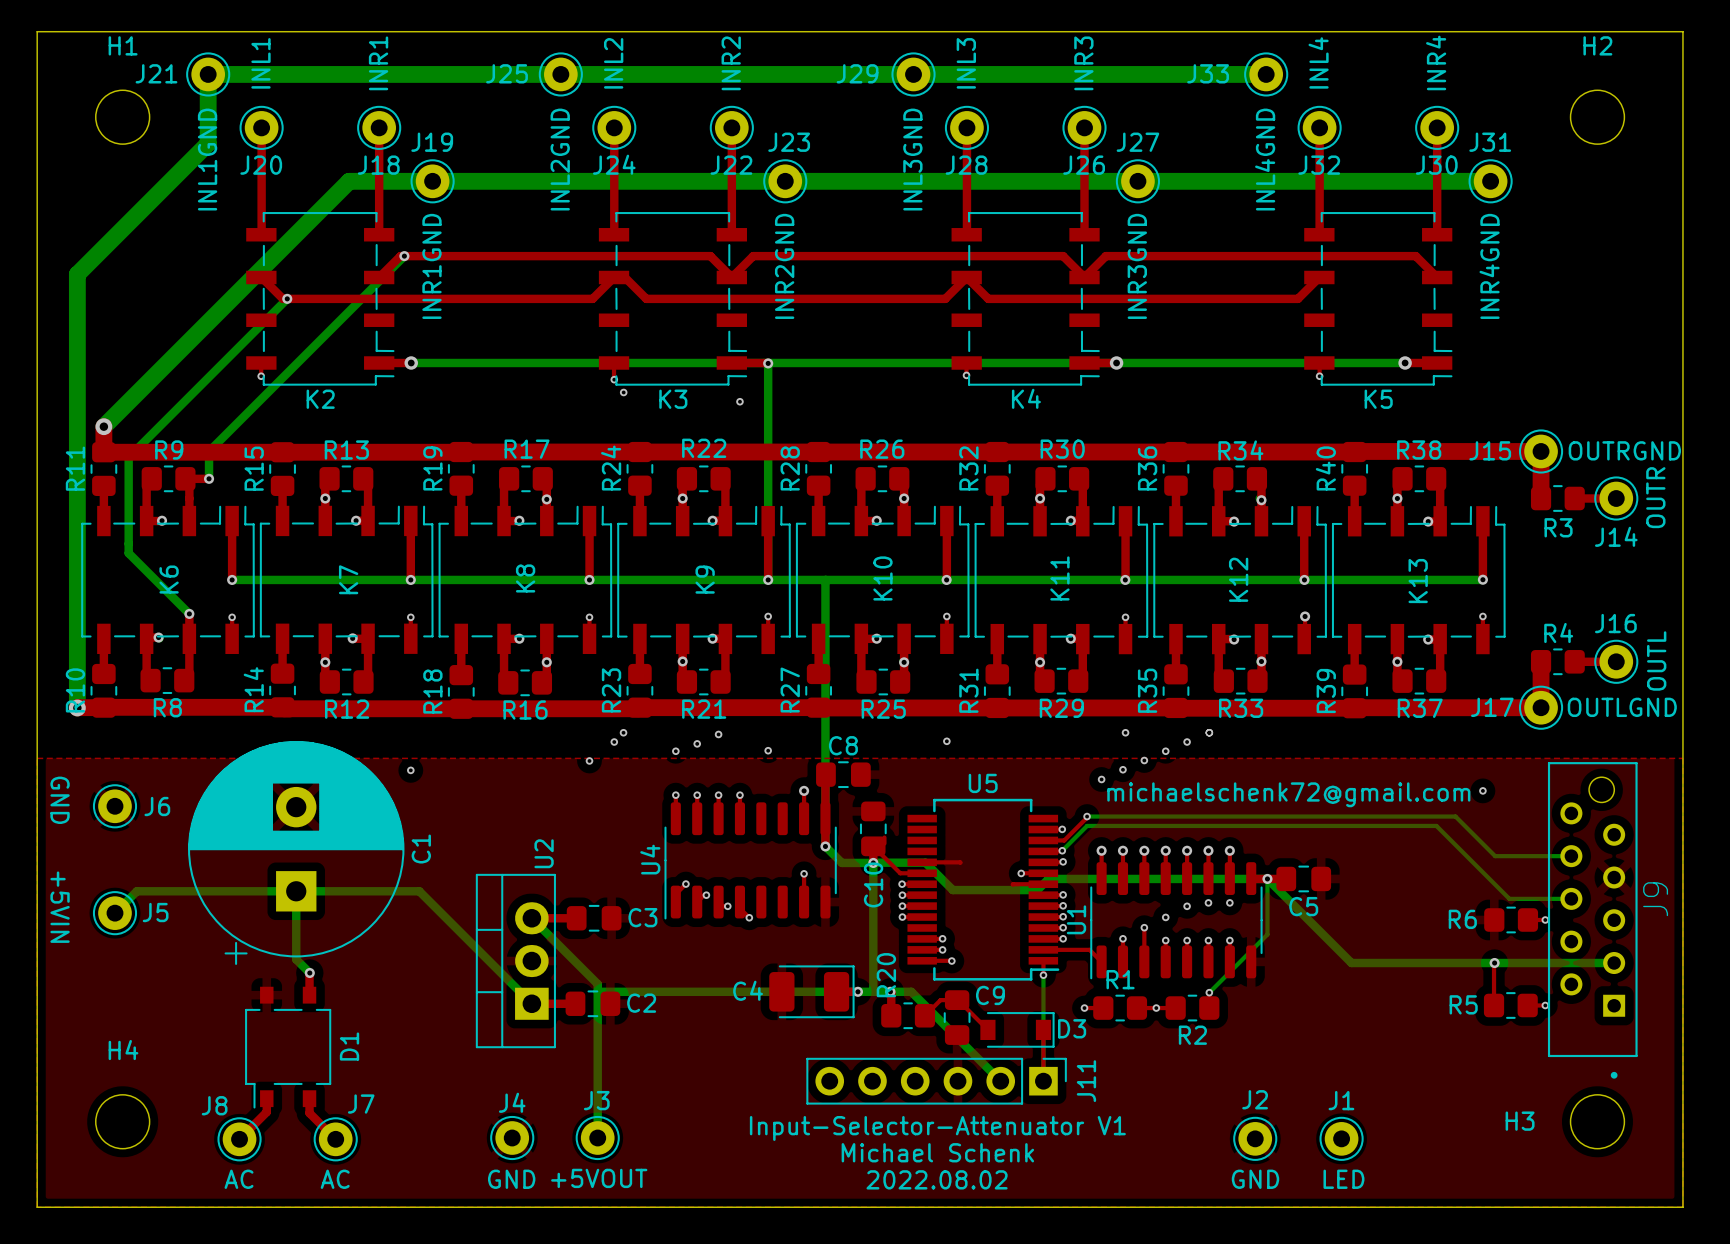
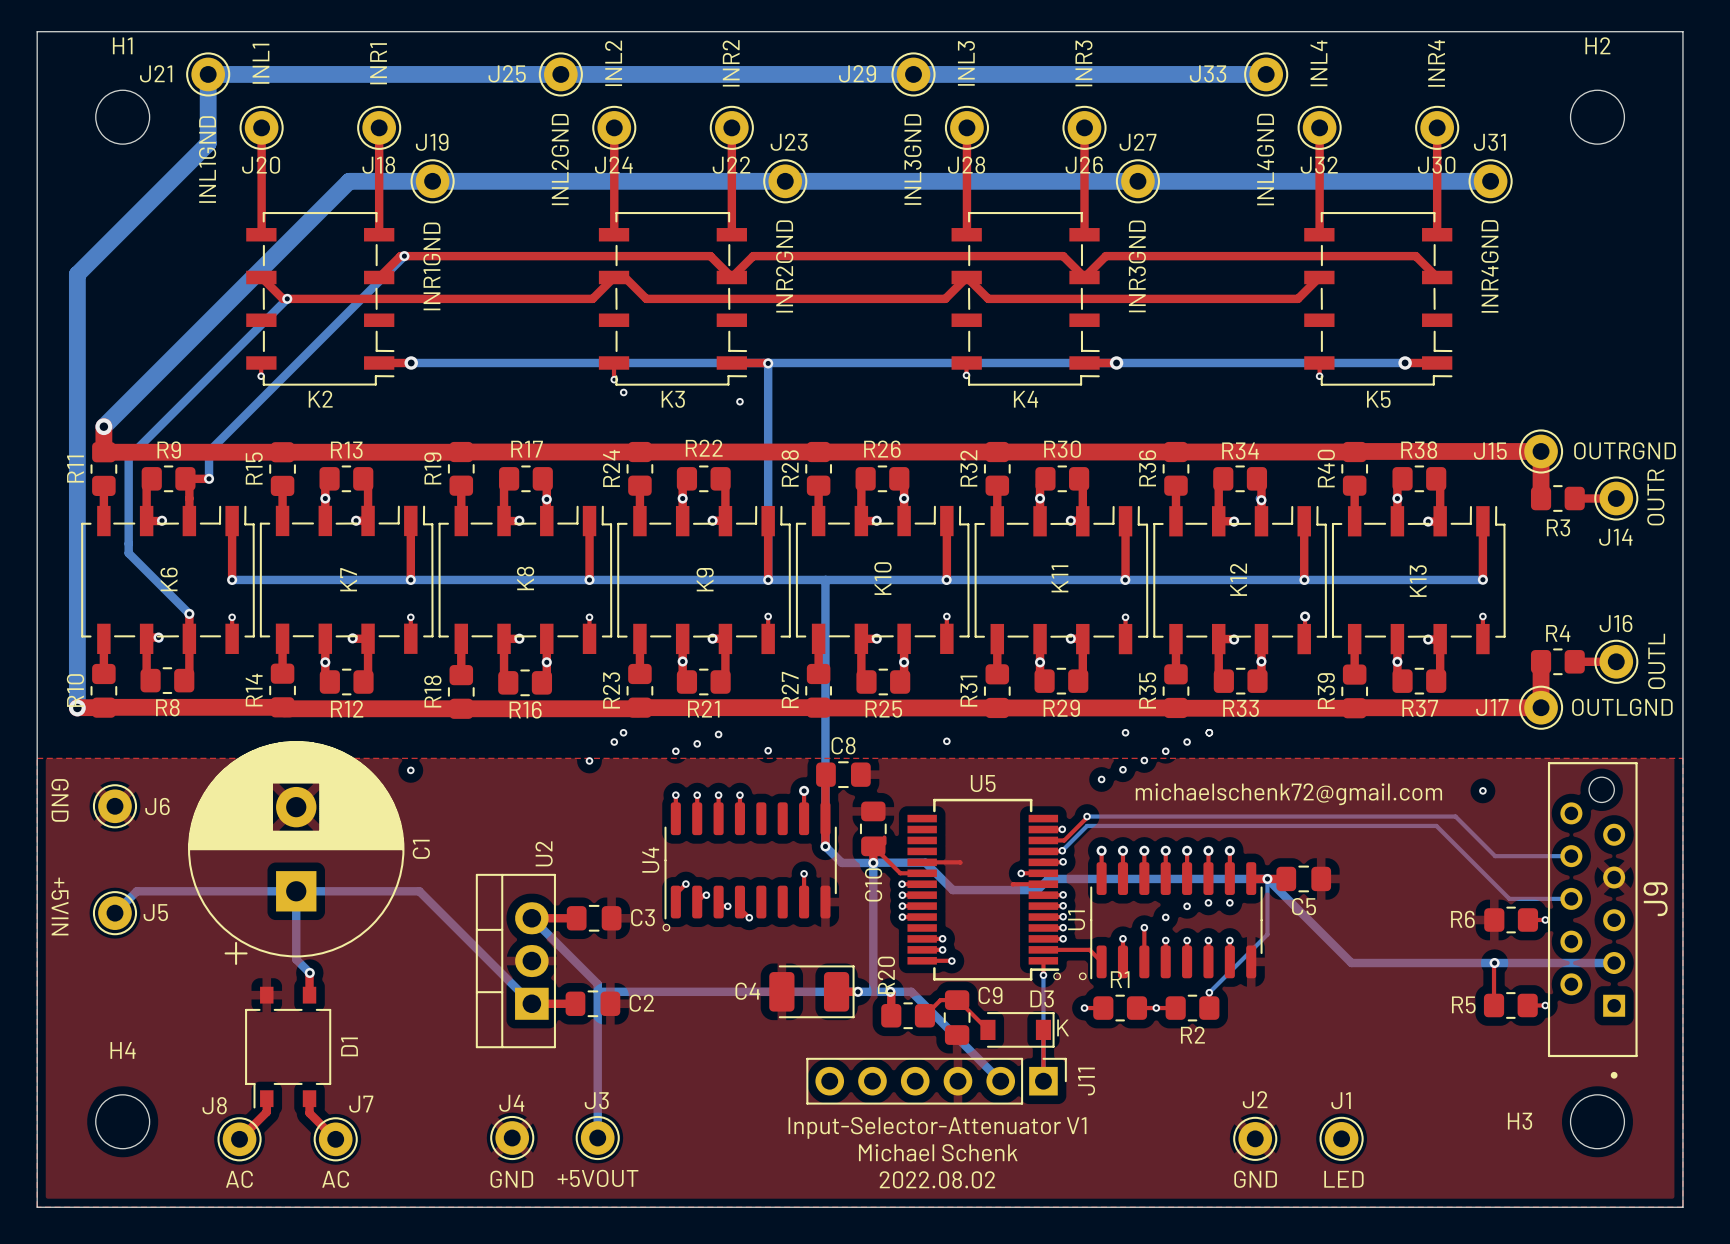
text: none -> ° (666, 927)
text: none -> ° (1057, 976)
text: none -> ° (1082, 976)
text: none -> K (1063, 1027)
D3 name position: D3 (1072, 1028) -> D3 (1042, 998)

